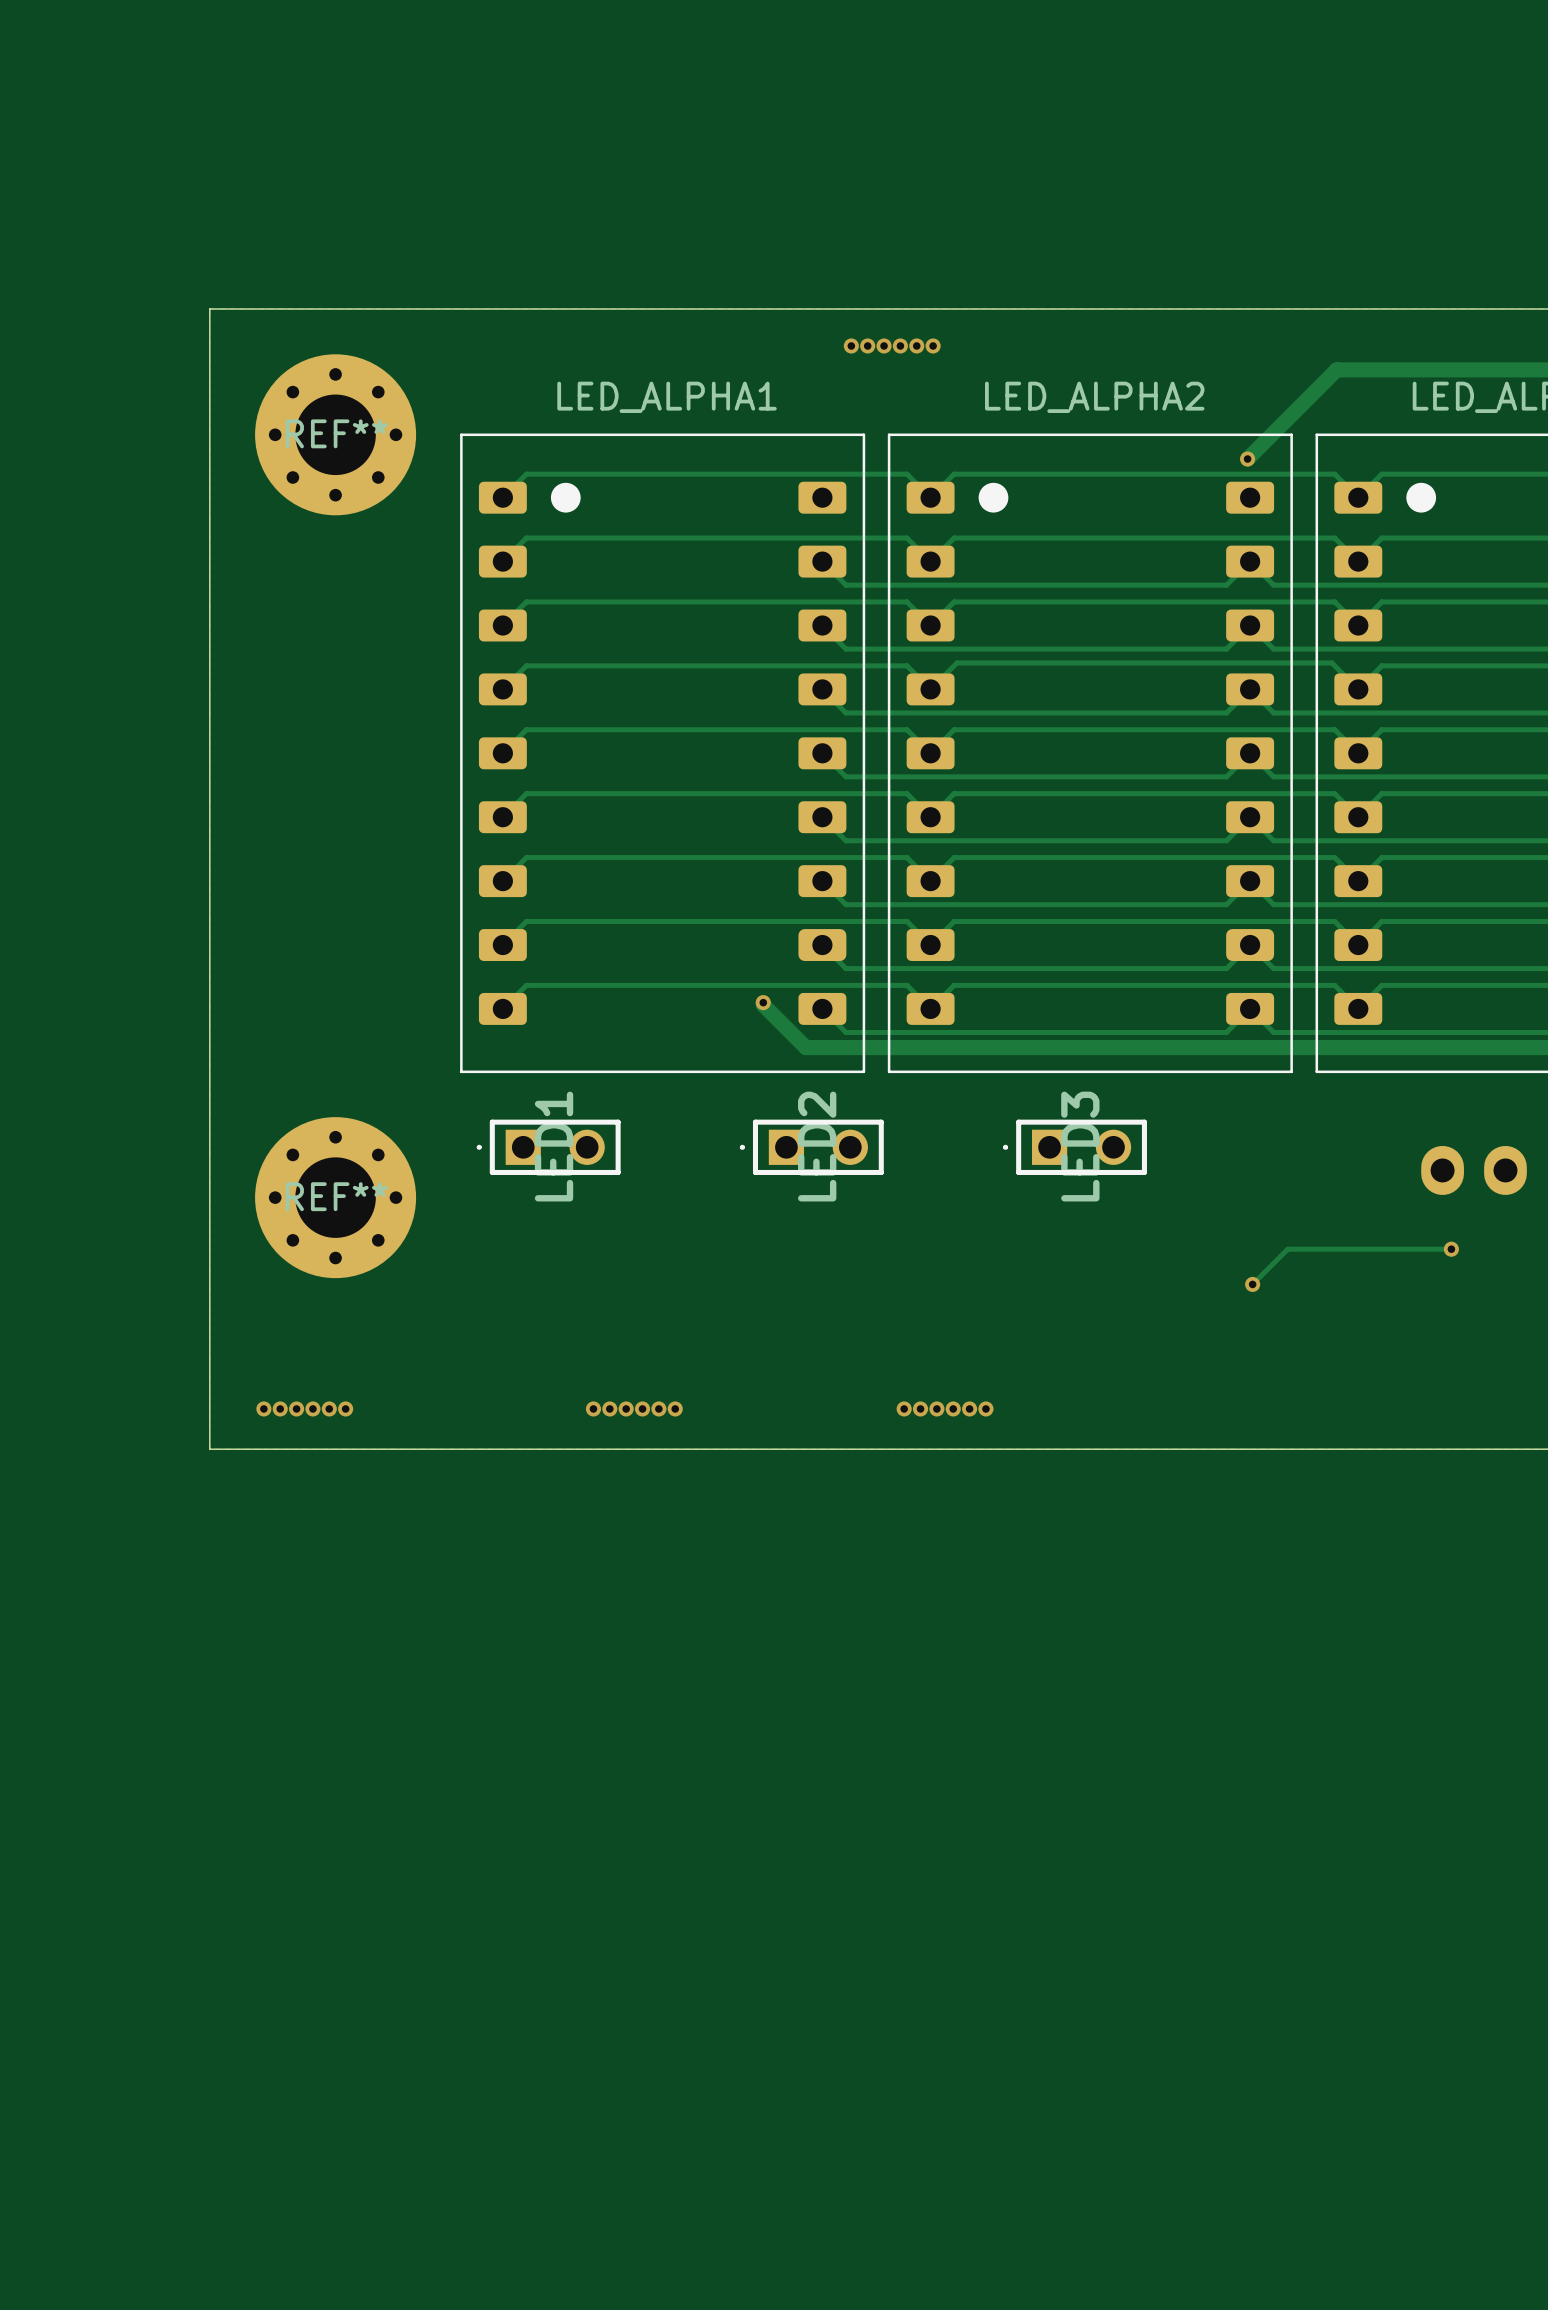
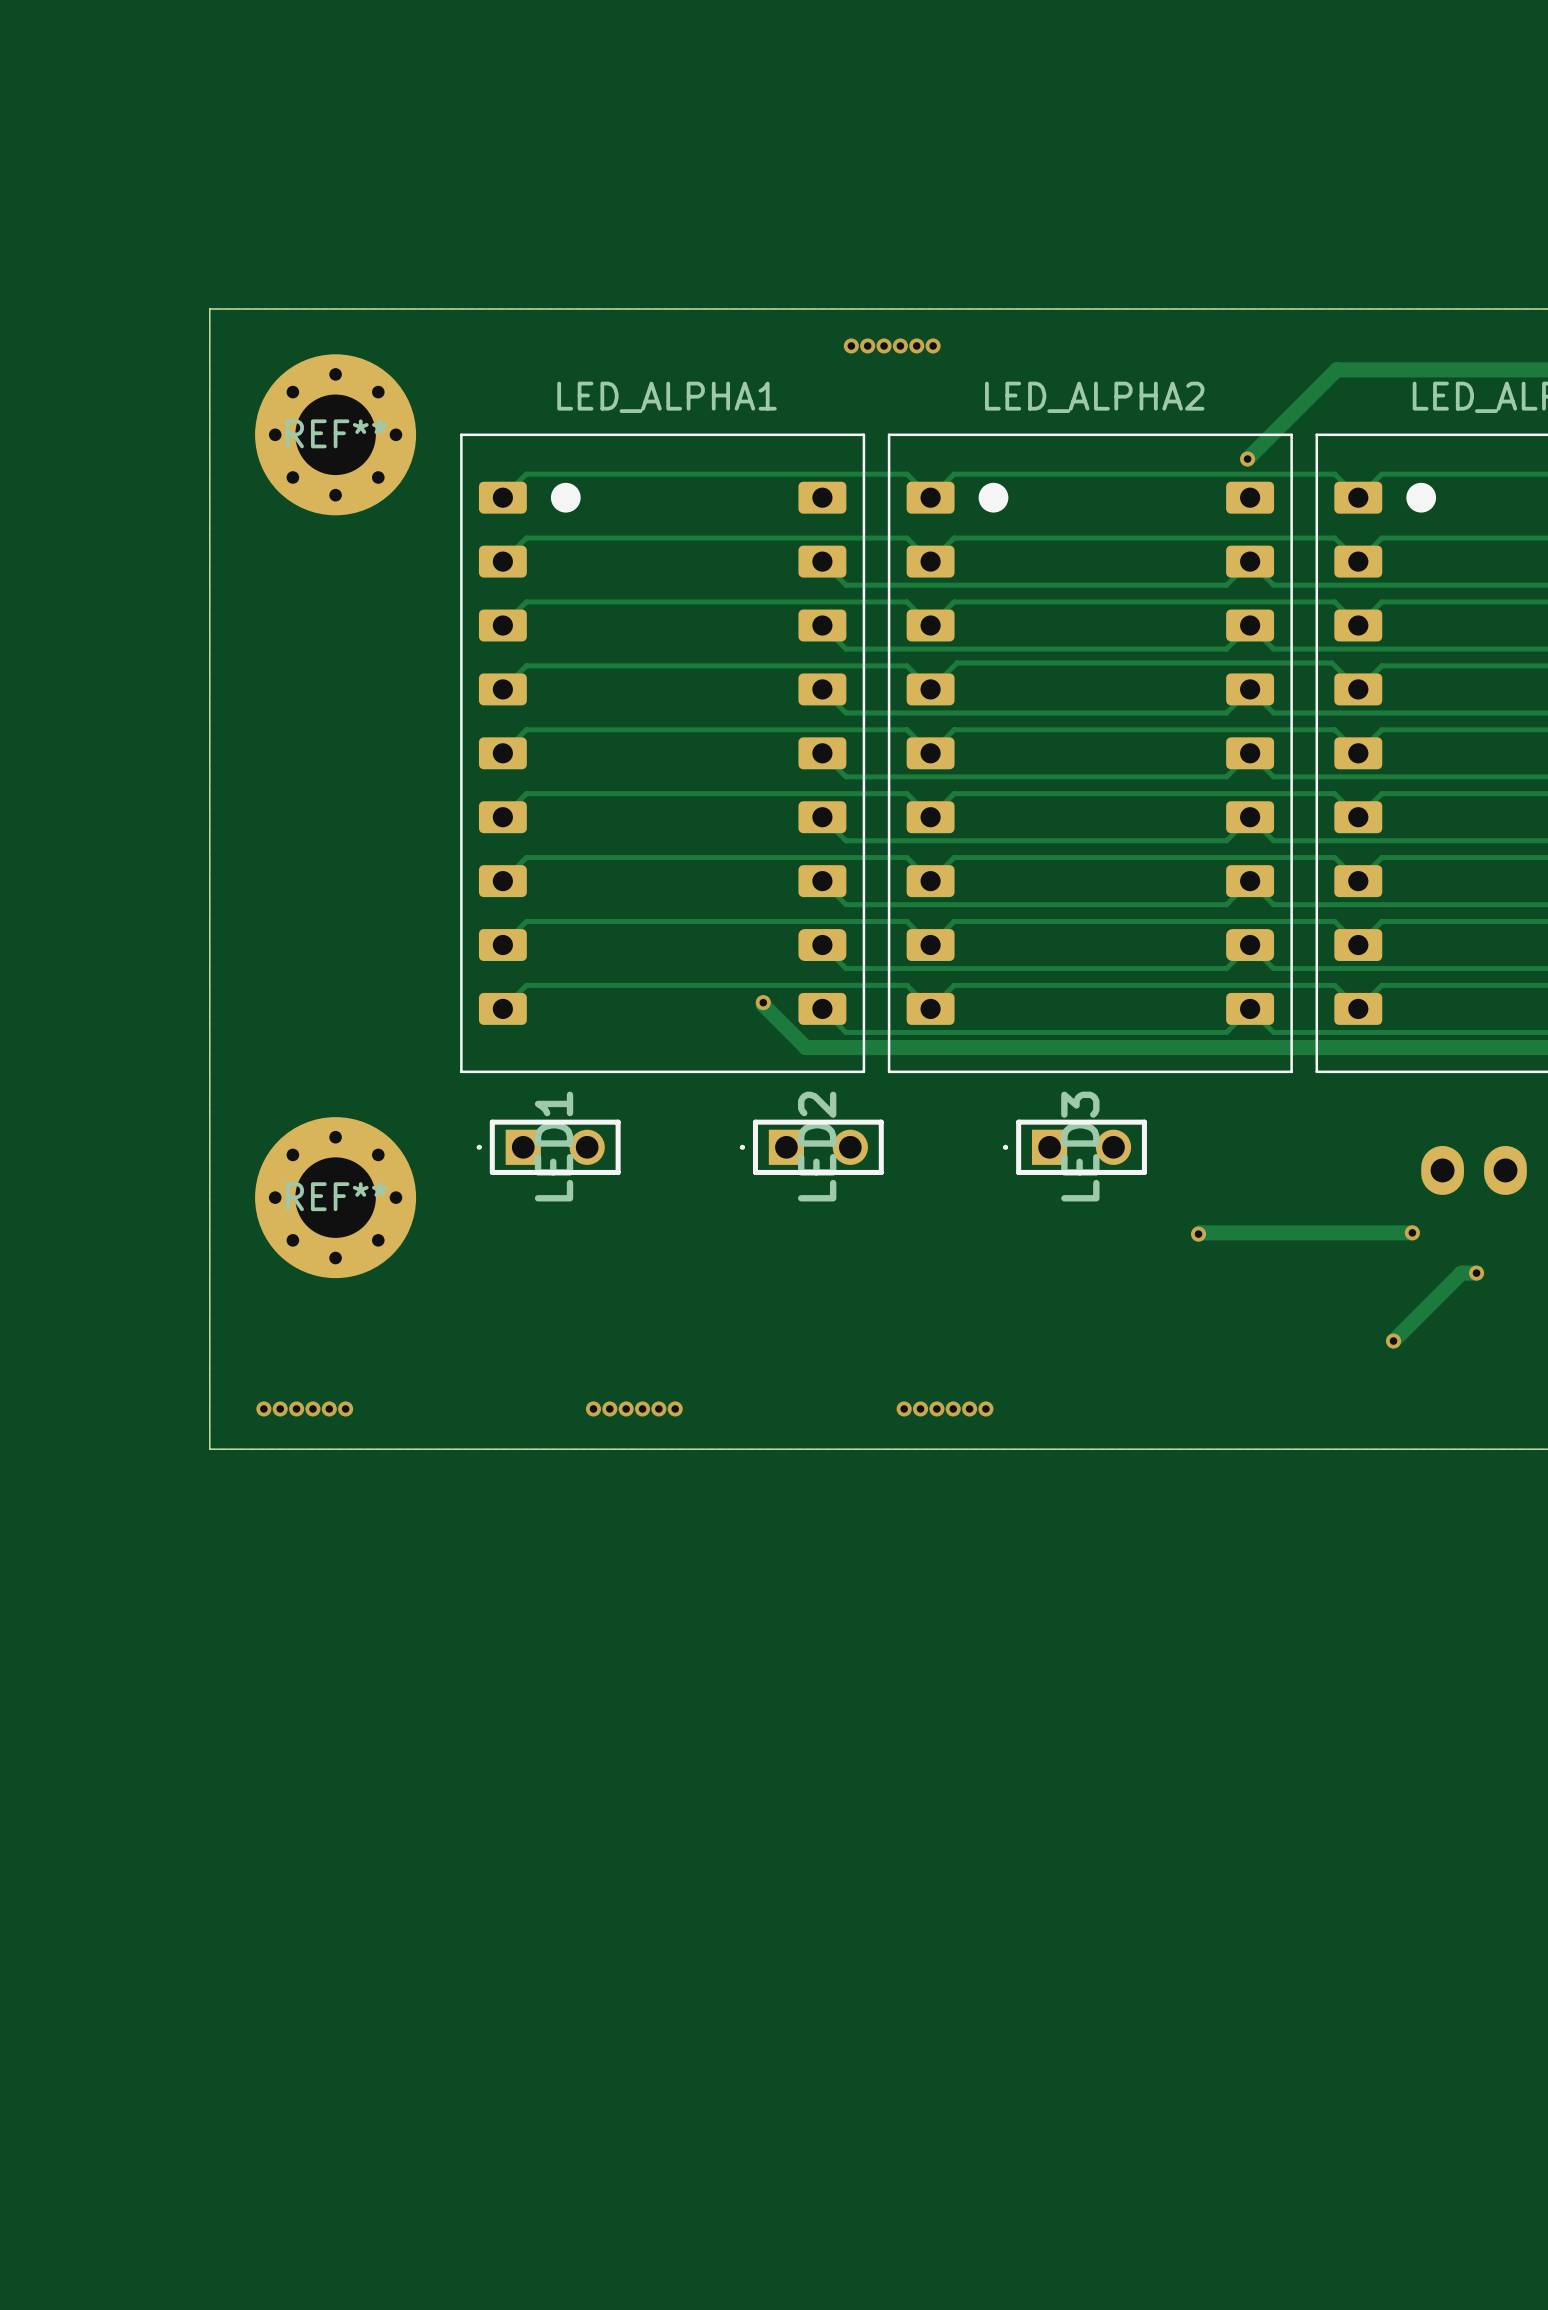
track: none -> (1412, 1232) (1198, 1234)
via: none -> (1412, 1232)
track: (1451, 1249) (1287, 1249) (1252, 1284) -> none
via: (1451, 1249) -> none
track: none -> (1476, 1273) (1461, 1273) (1393, 1341)
via: none -> (1476, 1273)
via position: (1252, 1284) -> (1198, 1234)
via: none -> (1393, 1341)

